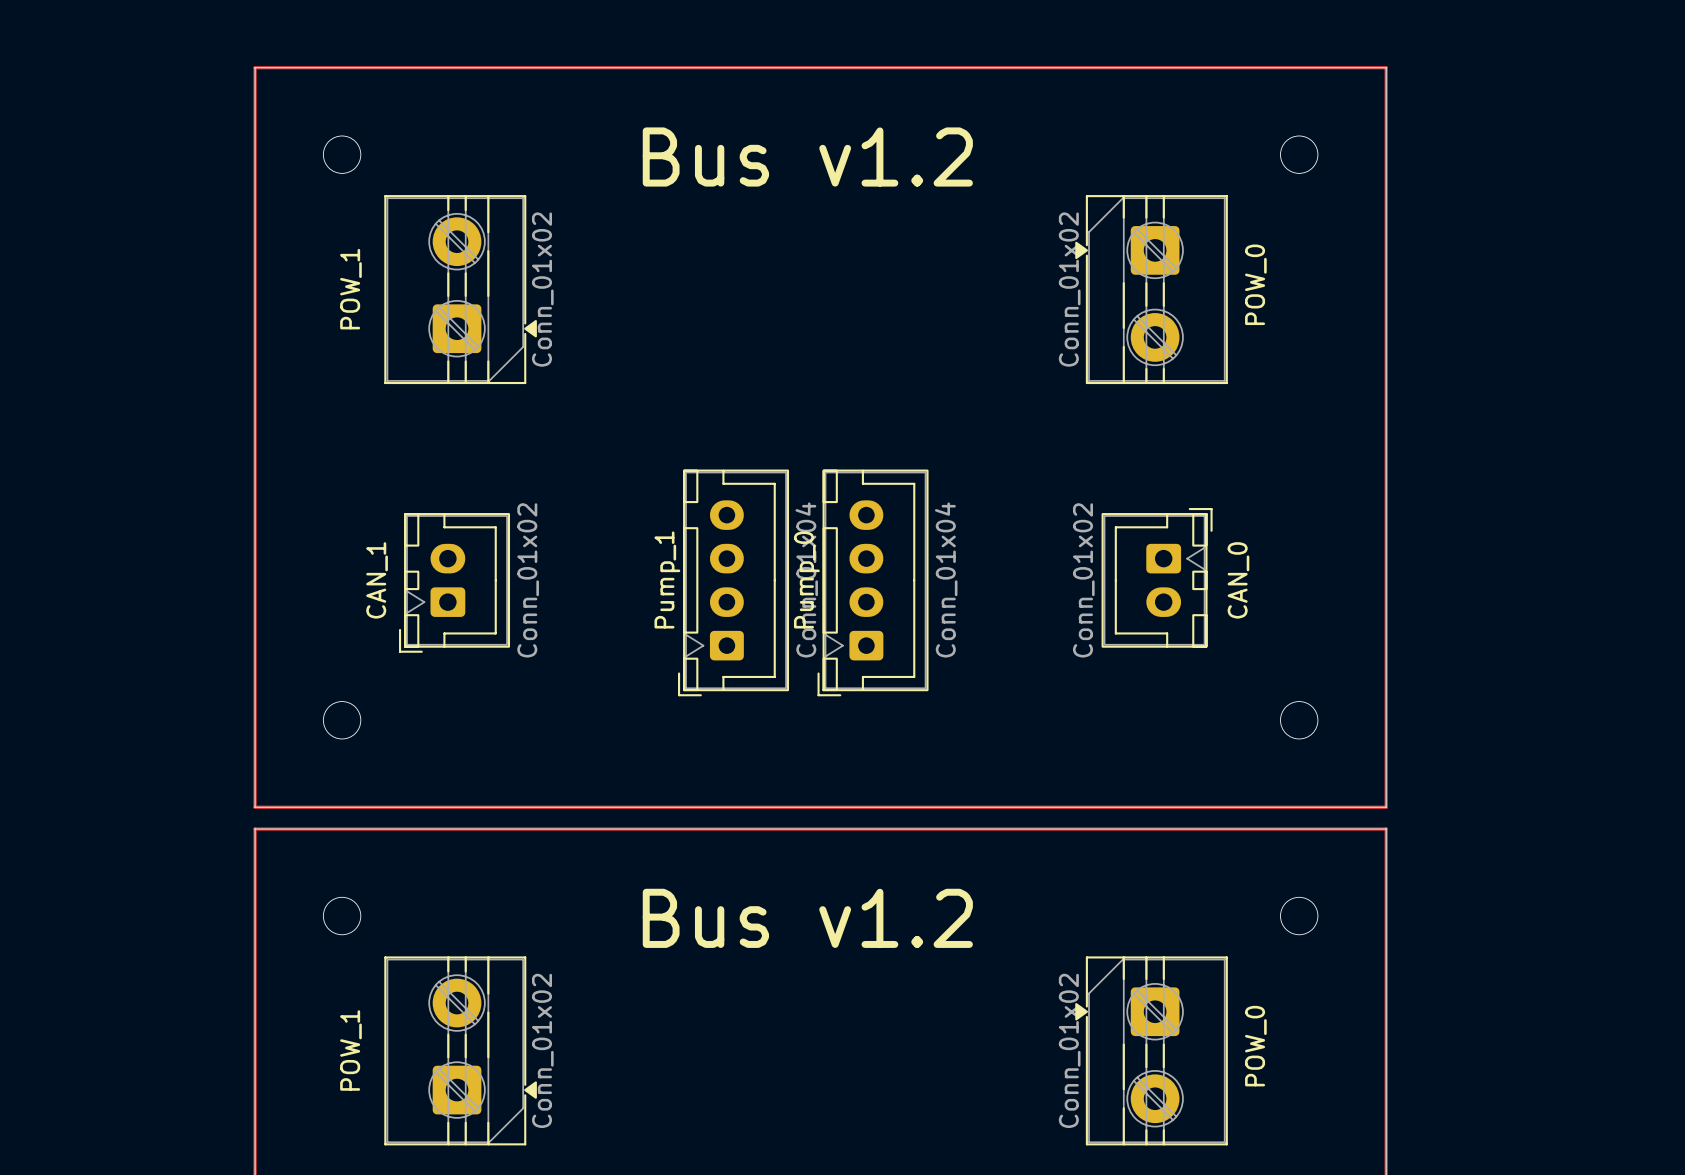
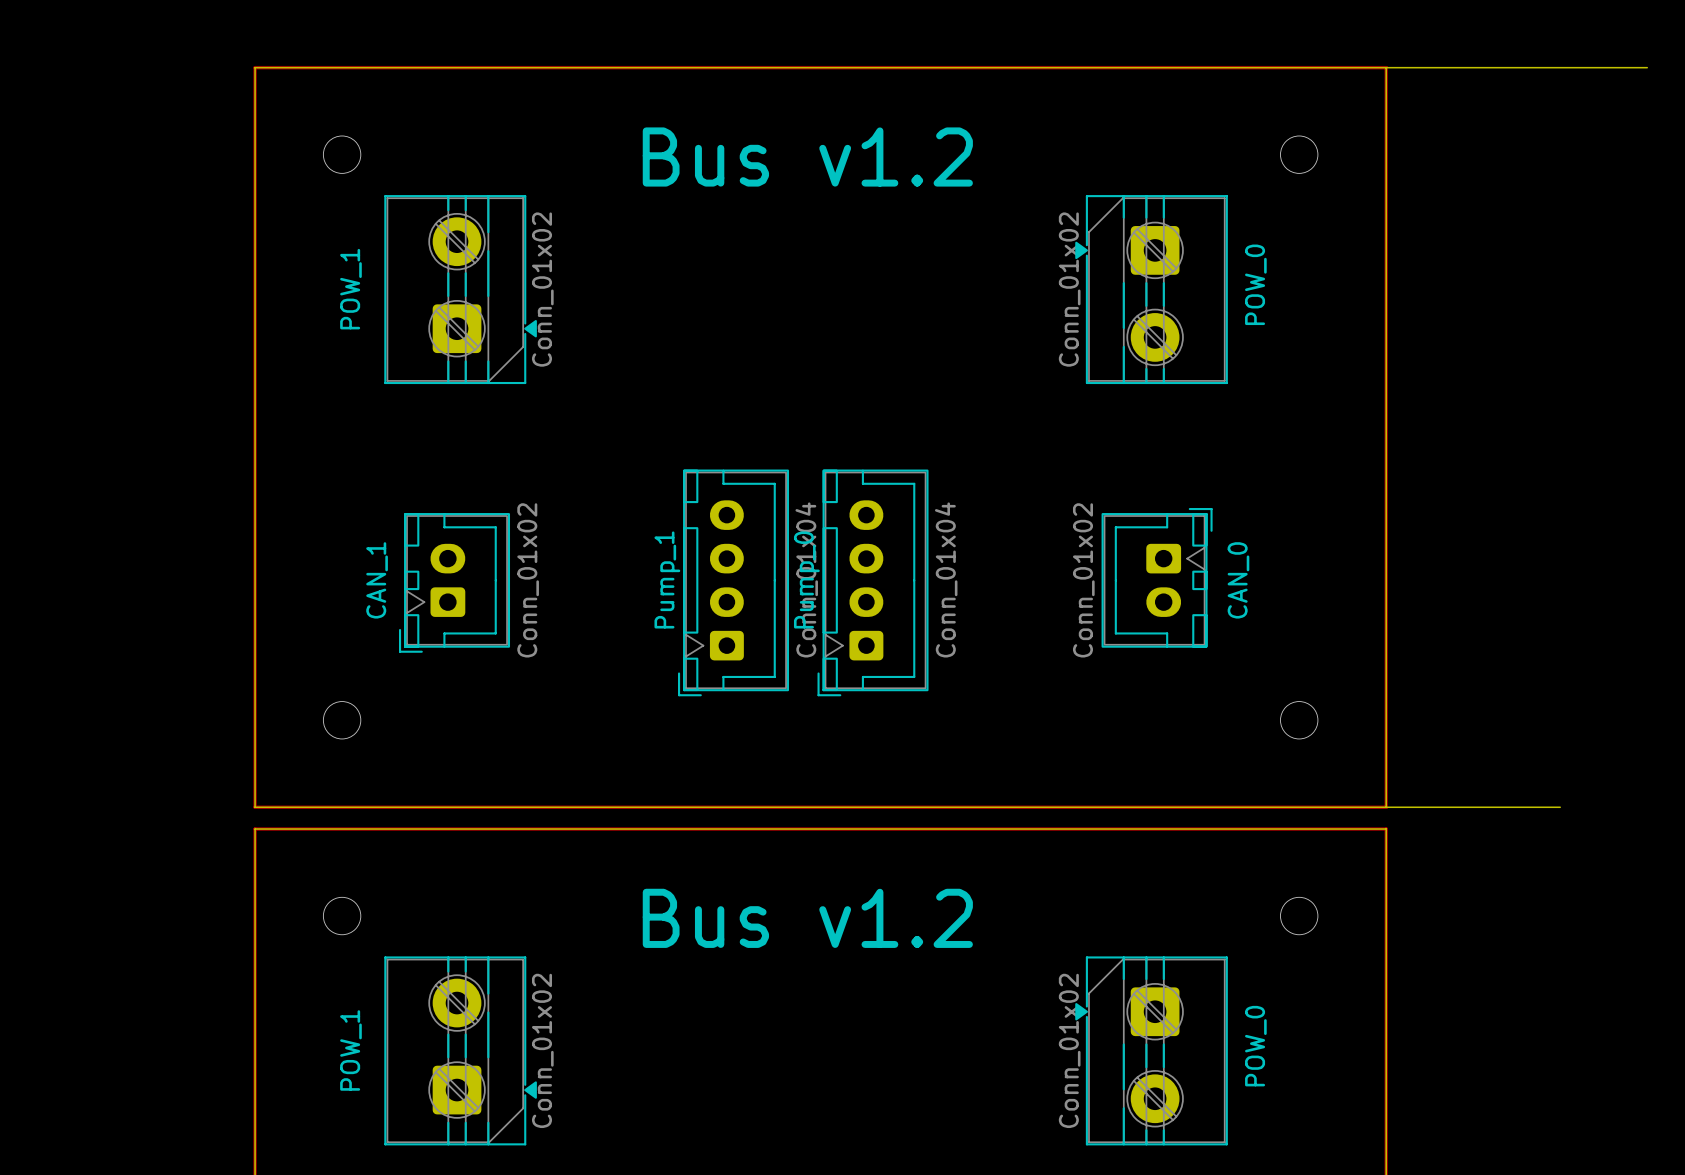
board edge: none -> (1386, 67) (1647, 67)
board edge: none -> (1386, 807) (1560, 807)

